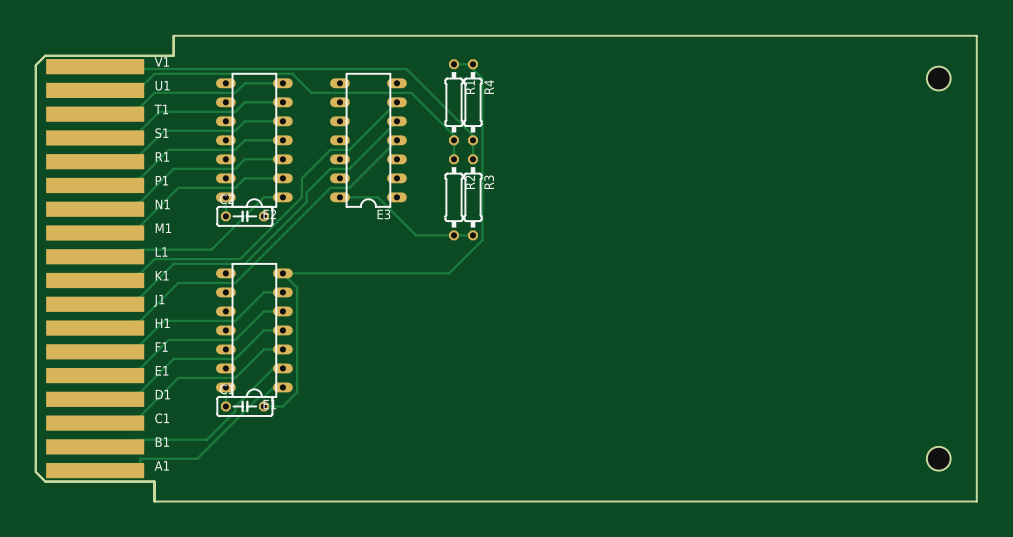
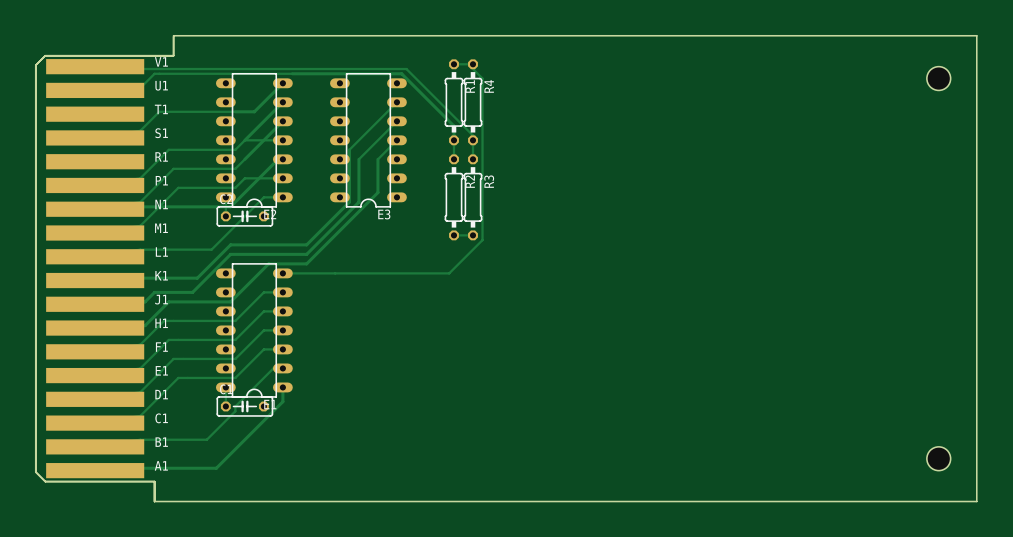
track: (292, 73) (311, 92) (411, 92) (453, 135) -> (292, 73) (401, 73) (453, 126) (453, 135)
track: (282, 83) (244, 83) (235, 92) (154, 92) (140, 107) (95, 114) -> none
track: (282, 102) (244, 102) (235, 111) -> (282, 83) (254, 111) (235, 111)
track: none -> (282, 102) (244, 140)
track: (282, 121) (244, 121) (235, 130) (164, 130) (140, 154) (95, 161) -> none
track: (349, 149) (330, 149) (301, 178) (301, 197) (240, 259) (154, 259) (140, 273) (95, 280) -> (349, 149) (349, 202) (306, 244) (230, 244) (197, 278) (97, 278) (95, 280)
track: (244, 159) (278, 159) -> (244, 159) (282, 121)
track: none -> (278, 159) (230, 206) (97, 206) (95, 209)
track: (358, 159) (349, 168) (330, 168) (306, 192) (306, 202) (244, 263) (173, 263) (140, 297) (95, 304) -> (358, 159) (358, 202) (306, 254) (230, 254) (192, 292) (154, 292) (145, 301) (97, 301) (95, 304)
track: (377, 159) (349, 187) (330, 187) (235, 282) (178, 282) (140, 320) (95, 328) -> (377, 159) (377, 192) (306, 263) (268, 263) (230, 301) (168, 301) (145, 325) (97, 325) (95, 328)
track: (339, 197) (377, 197) (415, 235) (453, 235) -> none
track: (282, 273) (297, 287) (297, 392) (282, 406) (263, 406) -> none
track: (282, 387) (273, 387) (263, 396) (259, 396) (197, 458) (140, 458) (140, 463) (95, 470) -> (282, 387) (282, 401) (216, 468) (97, 468) (95, 470)

